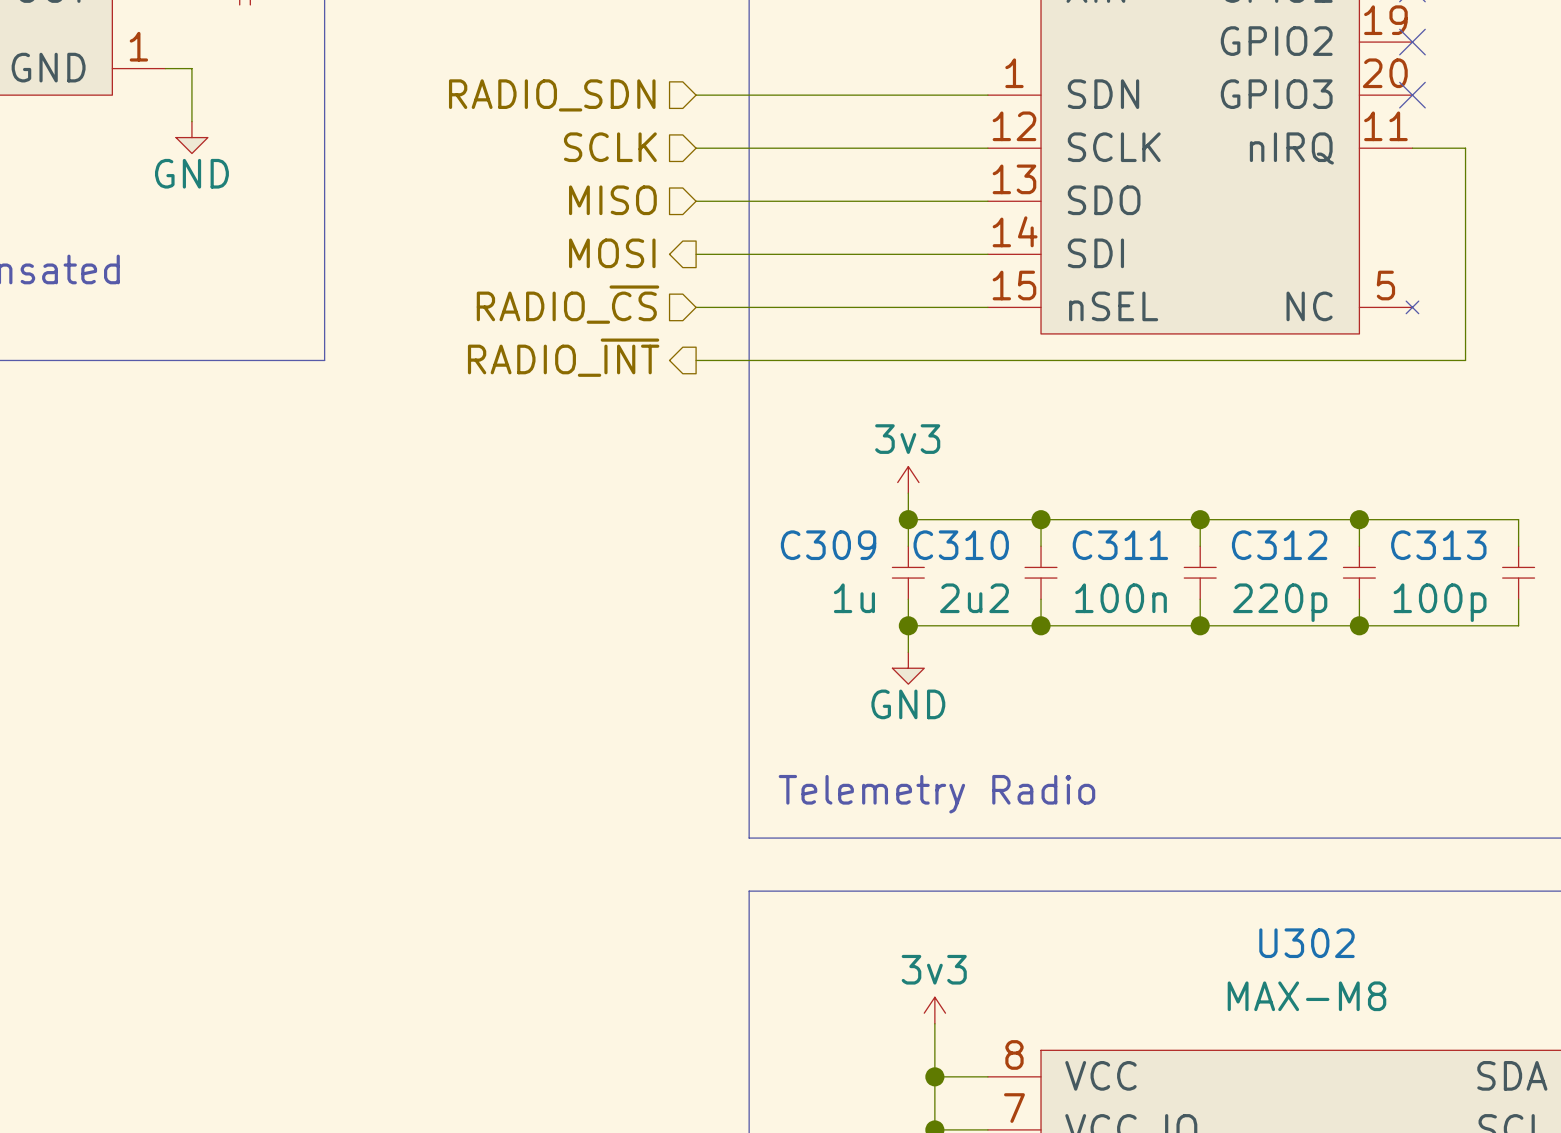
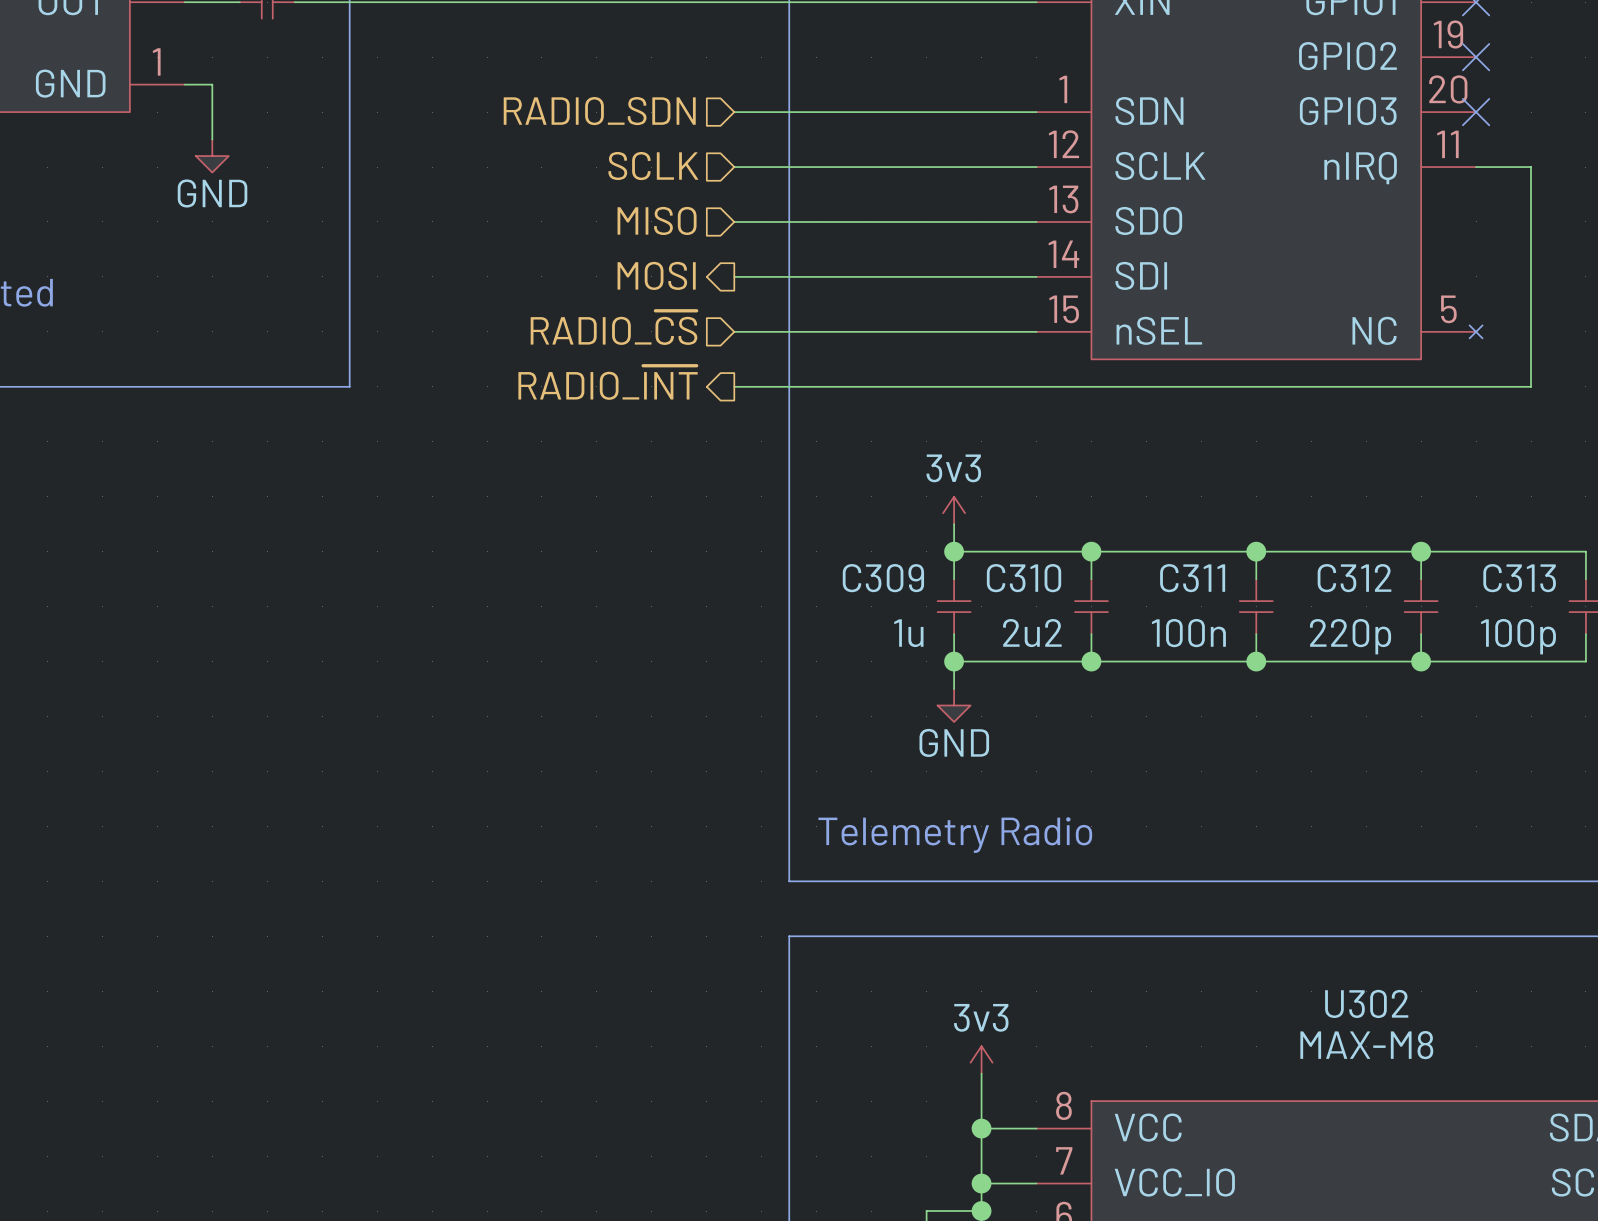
U302 name position: U302 (1306, 943) -> U302 (1366, 1003)

